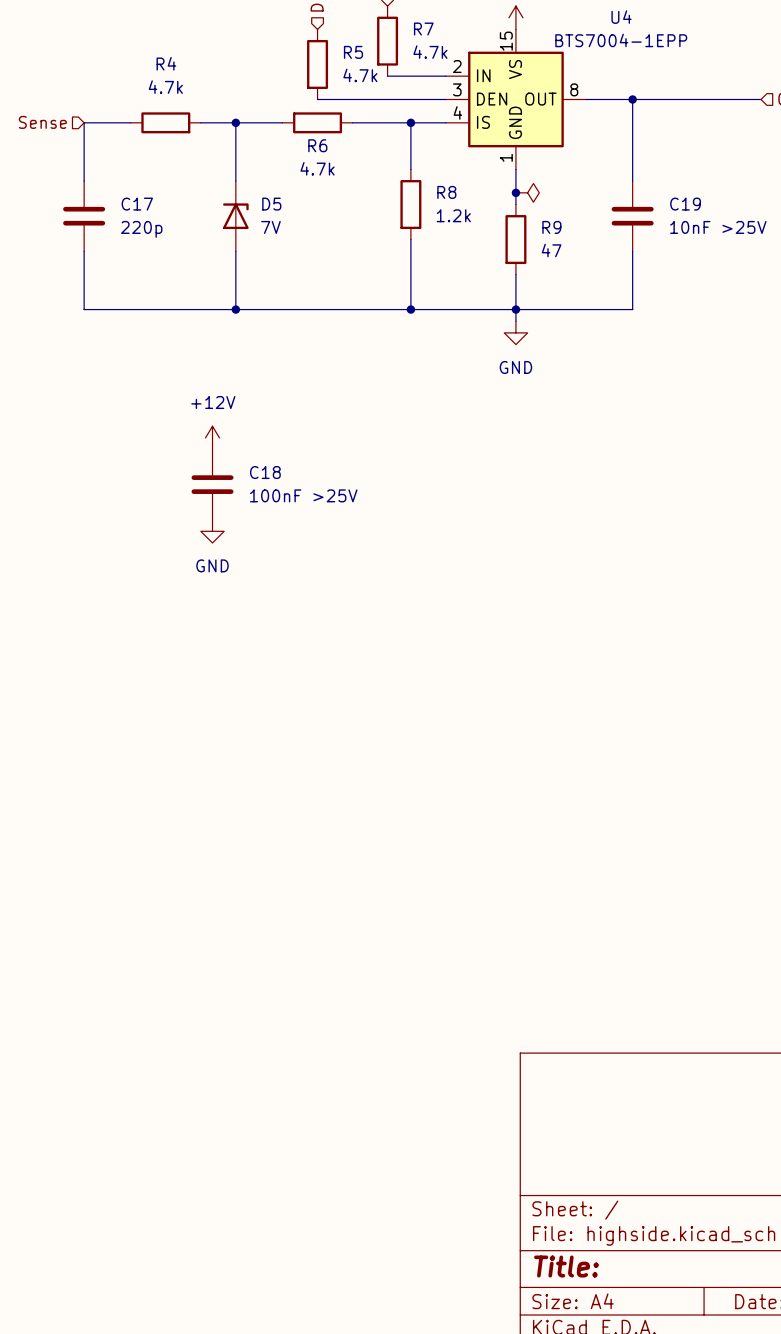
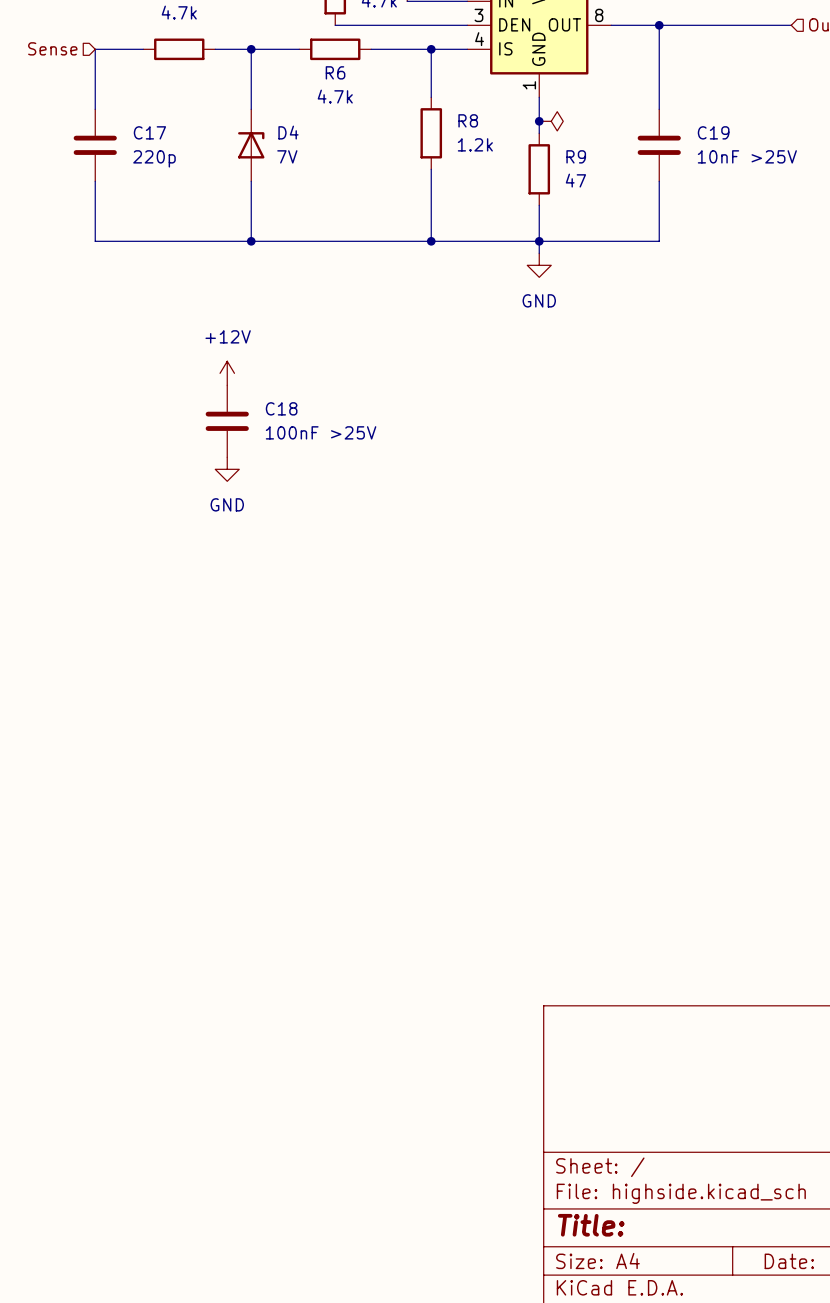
D5 name: D5 (271, 204) -> D4 (288, 132)

